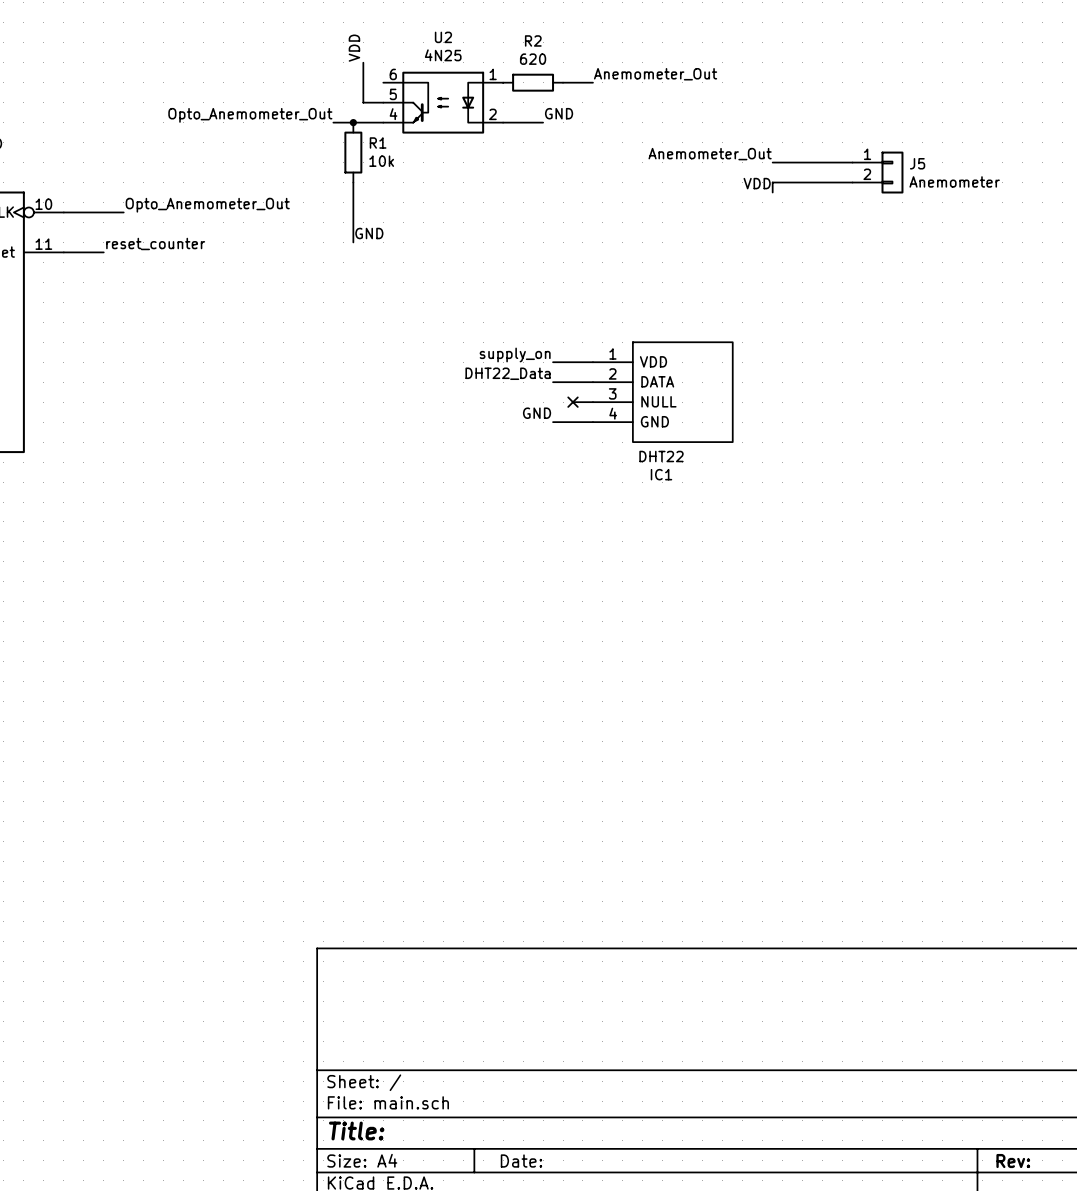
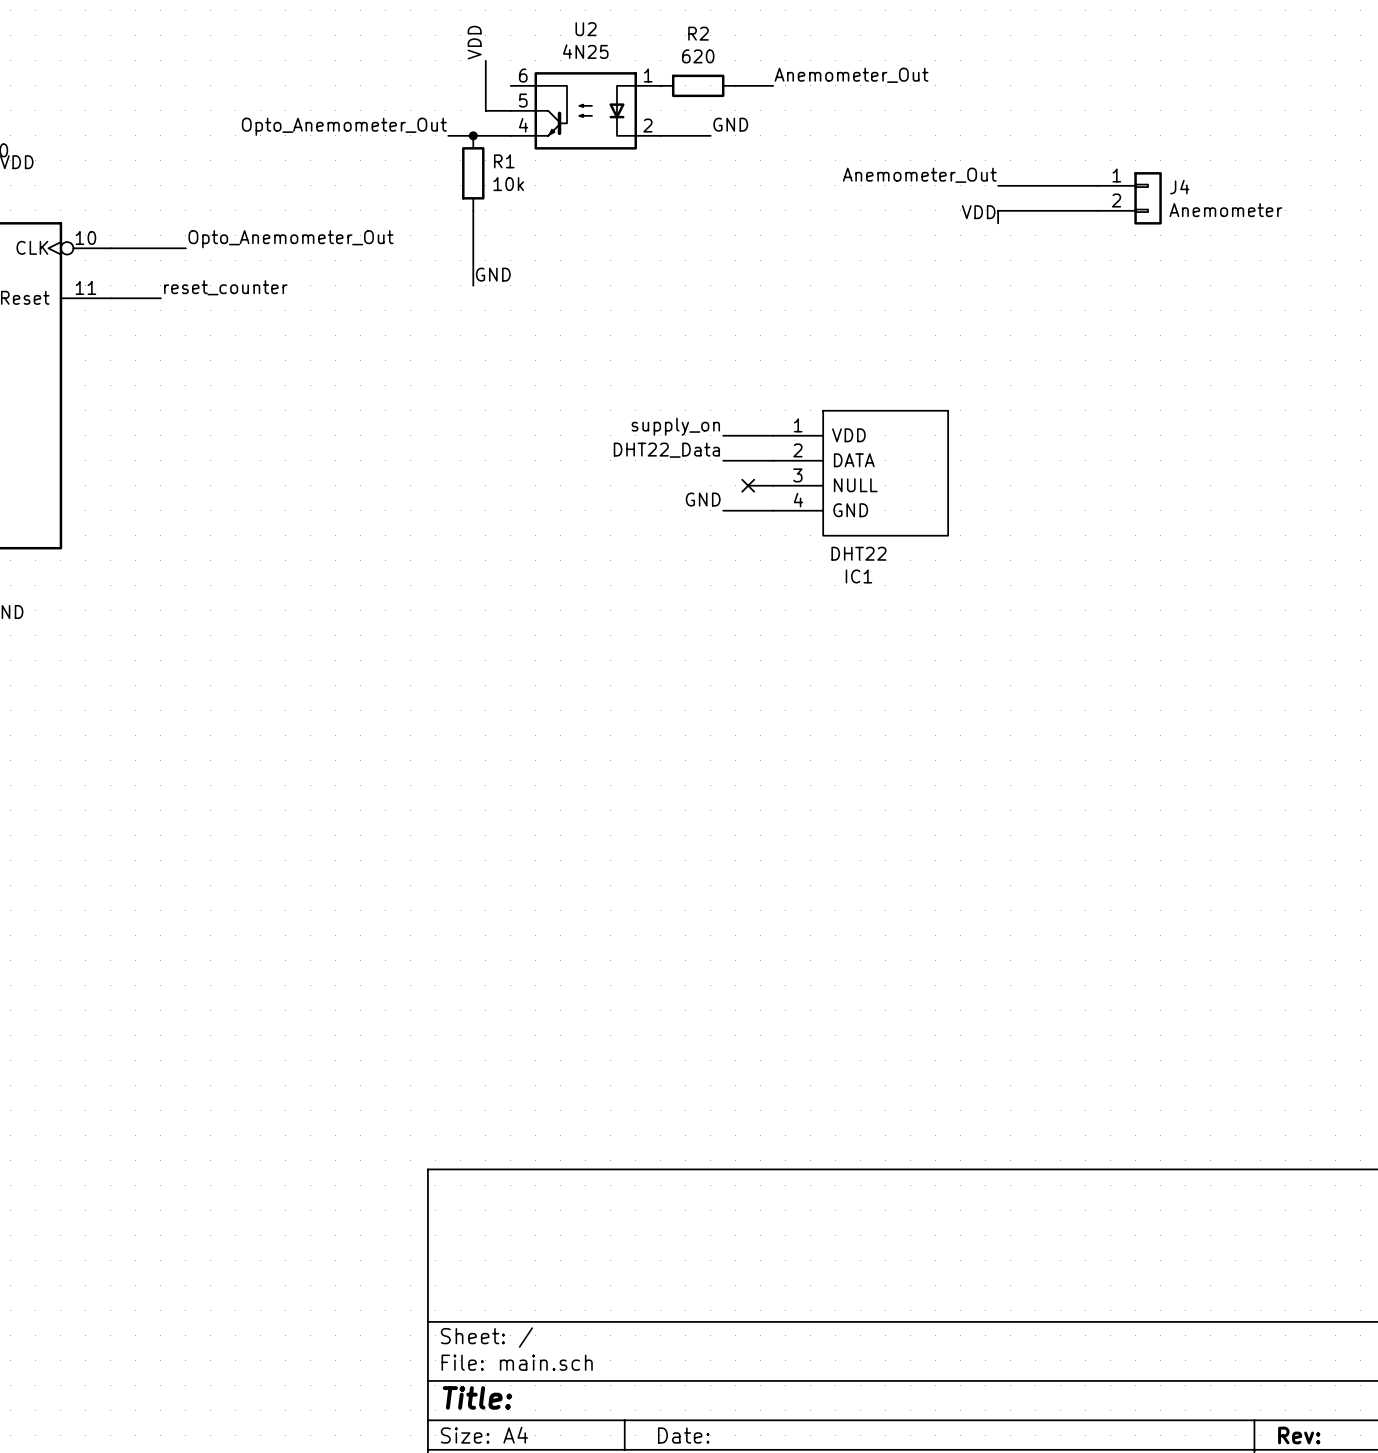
J5 name: J5 (917, 163) -> J4 (1179, 187)

